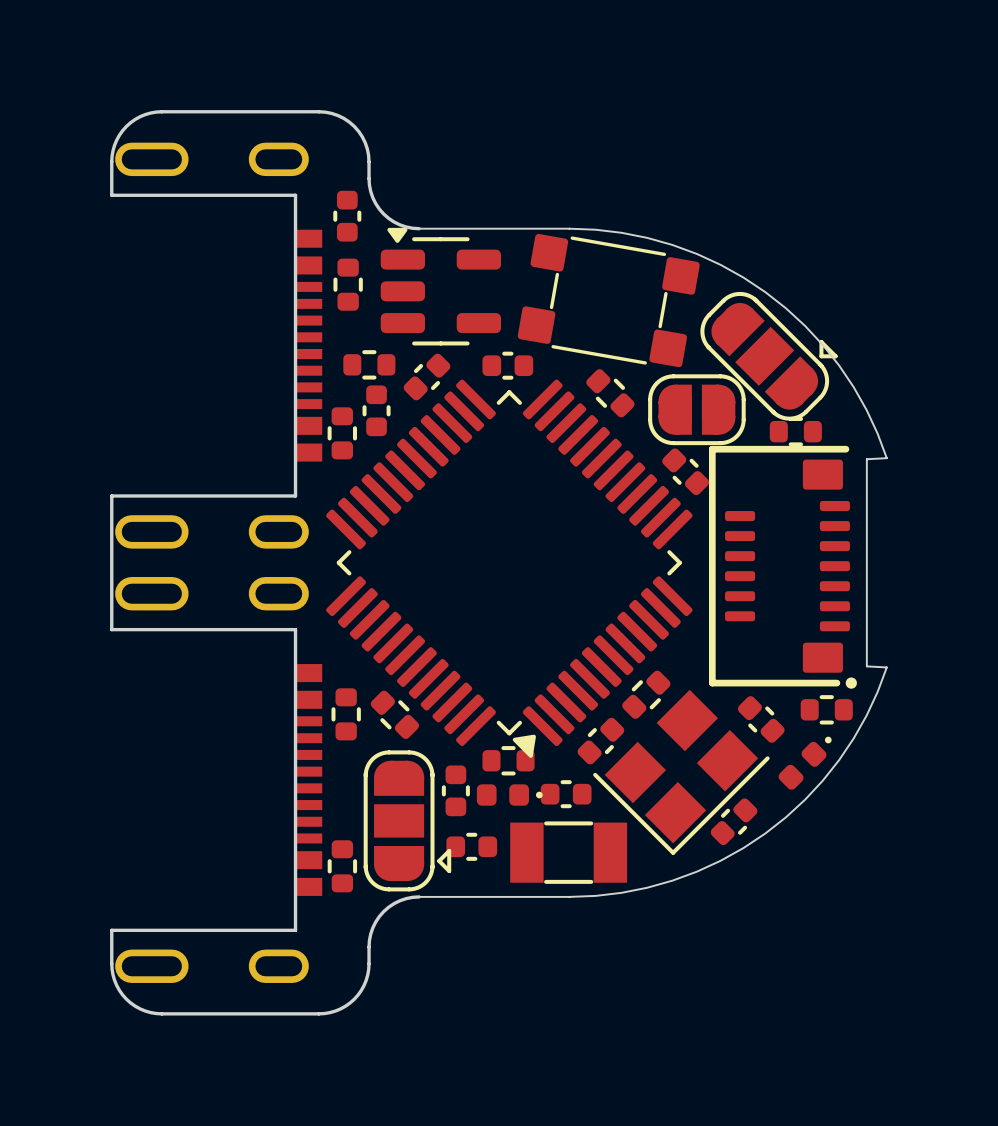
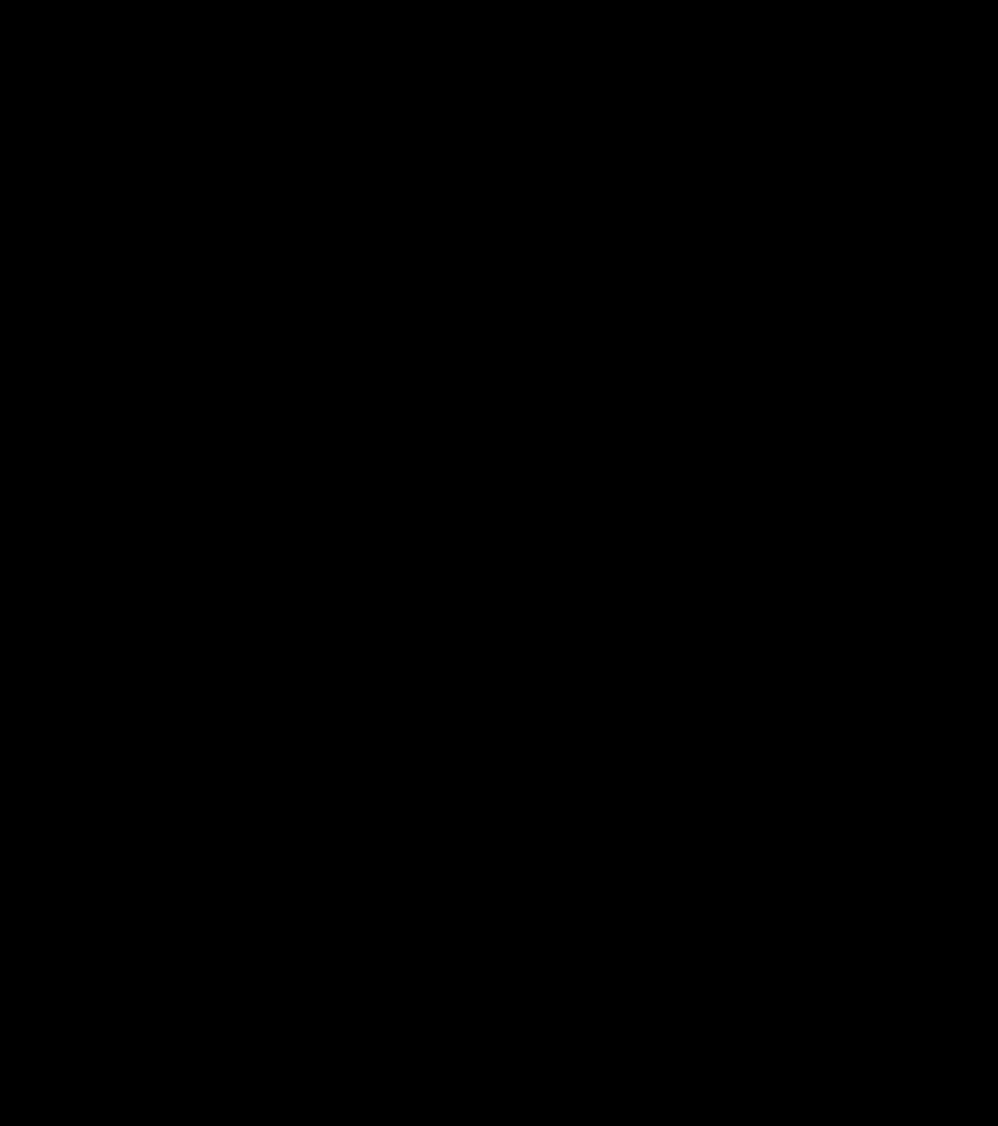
board edge: (161, 111) (318, 111) (338, 115) (349, 122) (362, 136) (368, 155) (369, 185) (372, 197) (383, 214) (399, 224) (419, 228) (595, 229) (621, 232) (672, 244) (720, 264) (743, 277) (785, 308) (822, 345) (853, 387) (866, 409) (886, 458) (866, 459) (866, 666) (886, 667) (866, 715) (839, 760) (805, 799) (785, 817) (743, 848) (720, 860) (672, 880) (647, 887) (595, 895) (419, 896) (399, 900) (383, 911) (372, 927) (369, 940) (367, 974) (361, 990) (345, 1006) (330, 1012) (156, 1013) (135, 1006) (122, 994) (116, 985) (112, 969) (111, 930) (295, 930) (295, 629) (111, 629) (111, 495) (295, 495) (295, 195) (111, 195) (112, 156) (119, 135) (130, 122) (140, 116) (161, 111) -> none
part: (347, 216) -> none
part: (348, 284) -> none
part: (440, 286) -> none
part: (608, 300) -> none
part: (218, 345) -> none
part: (769, 356) -> none
part: (369, 364) -> none
part: (507, 365) -> none
part: (427, 377) -> none
part: (610, 393) -> none
part: (696, 409) -> none
part: (376, 410) -> none
part: (795, 431) -> none
part: (342, 433) -> none
part: (685, 471) -> none
part: (782, 567) -> none
part: (509, 568) -> none
part: (646, 694) -> none
part: (826, 709) -> none
part: (346, 714) -> none
part: (394, 714) -> none
part: (761, 719) -> none
part: (600, 741) -> none
part: (508, 760) -> none
part: (805, 763) -> none
part: (681, 772) -> none
part: (218, 779) -> none
part: (455, 790) -> none
part: (566, 794) -> none
part: (509, 795) -> none
part: (407, 820) -> none
part: (734, 821) -> none
part: (471, 846) -> none
part: (568, 852) -> none
part: (342, 866) -> none

